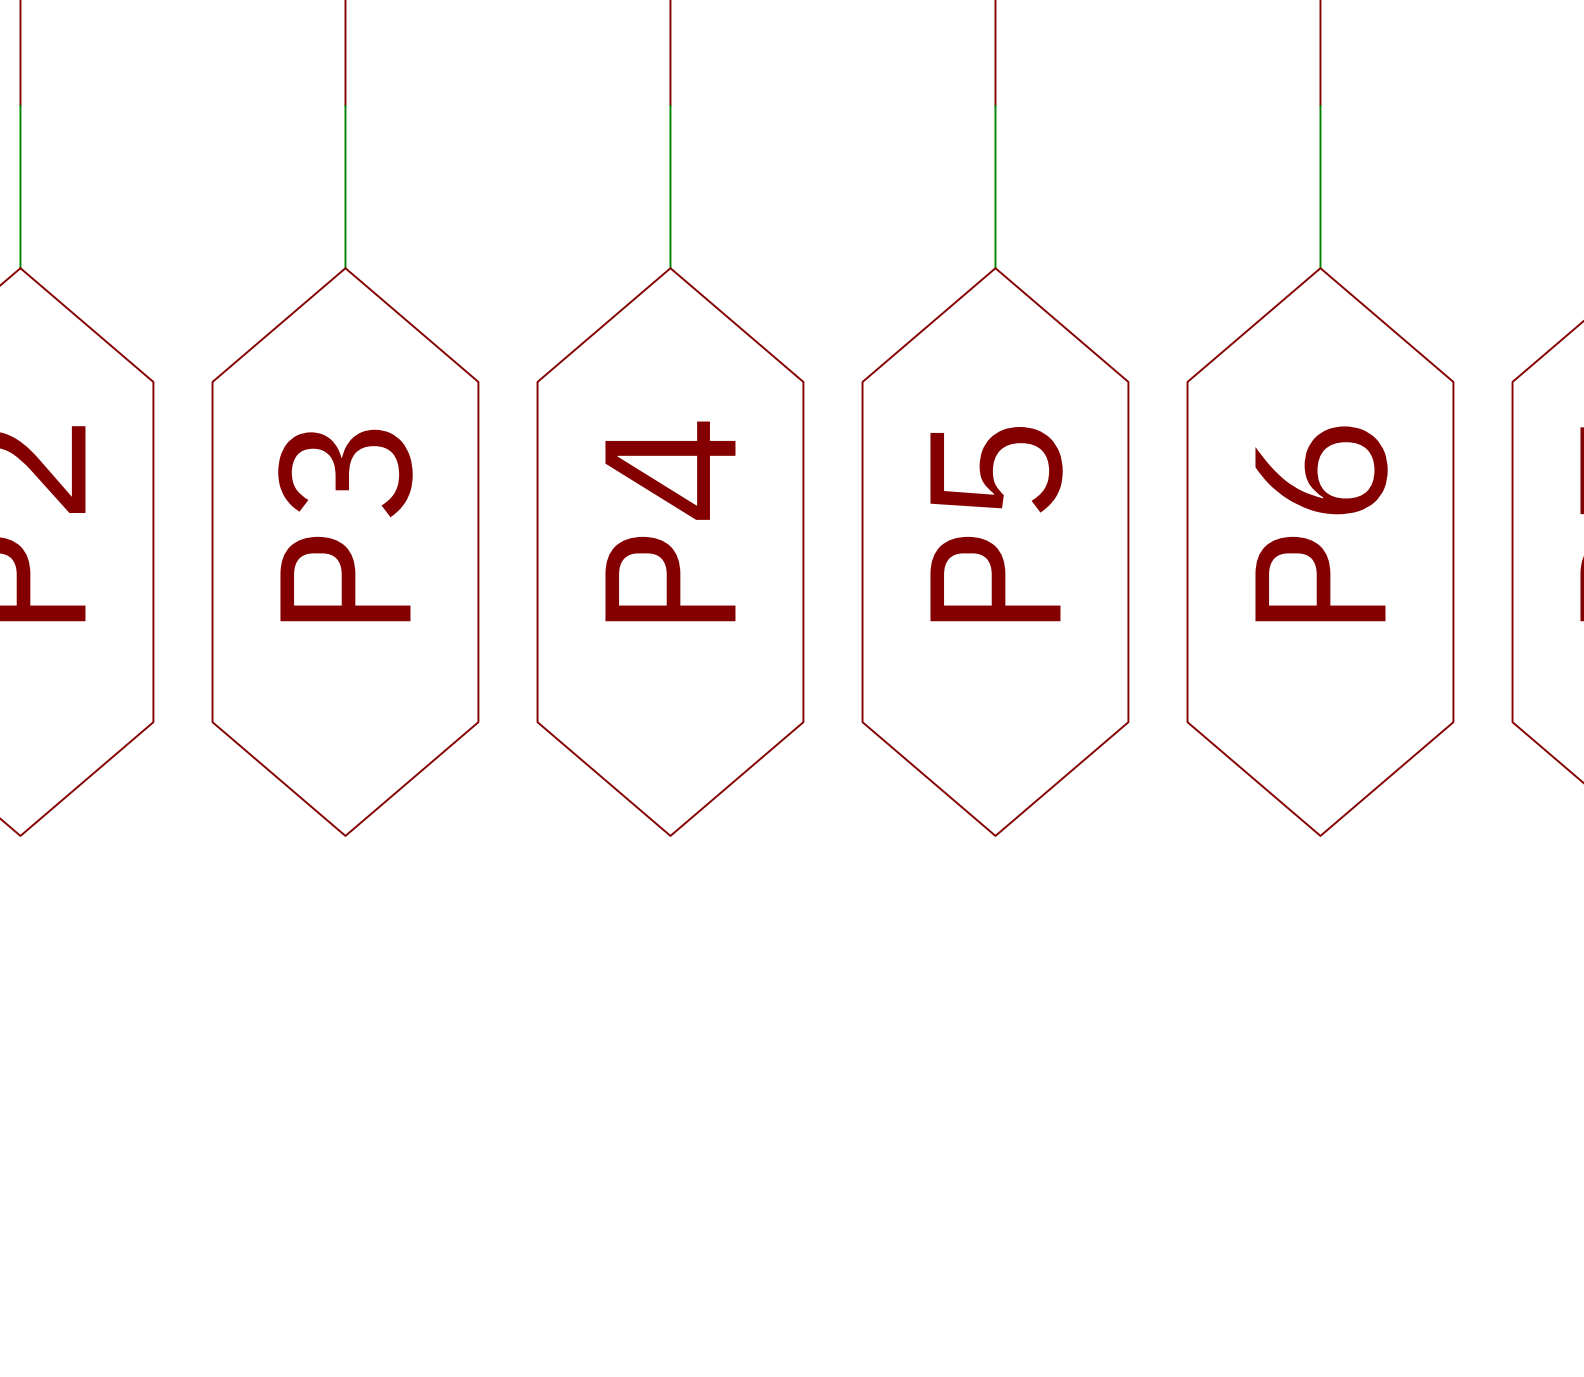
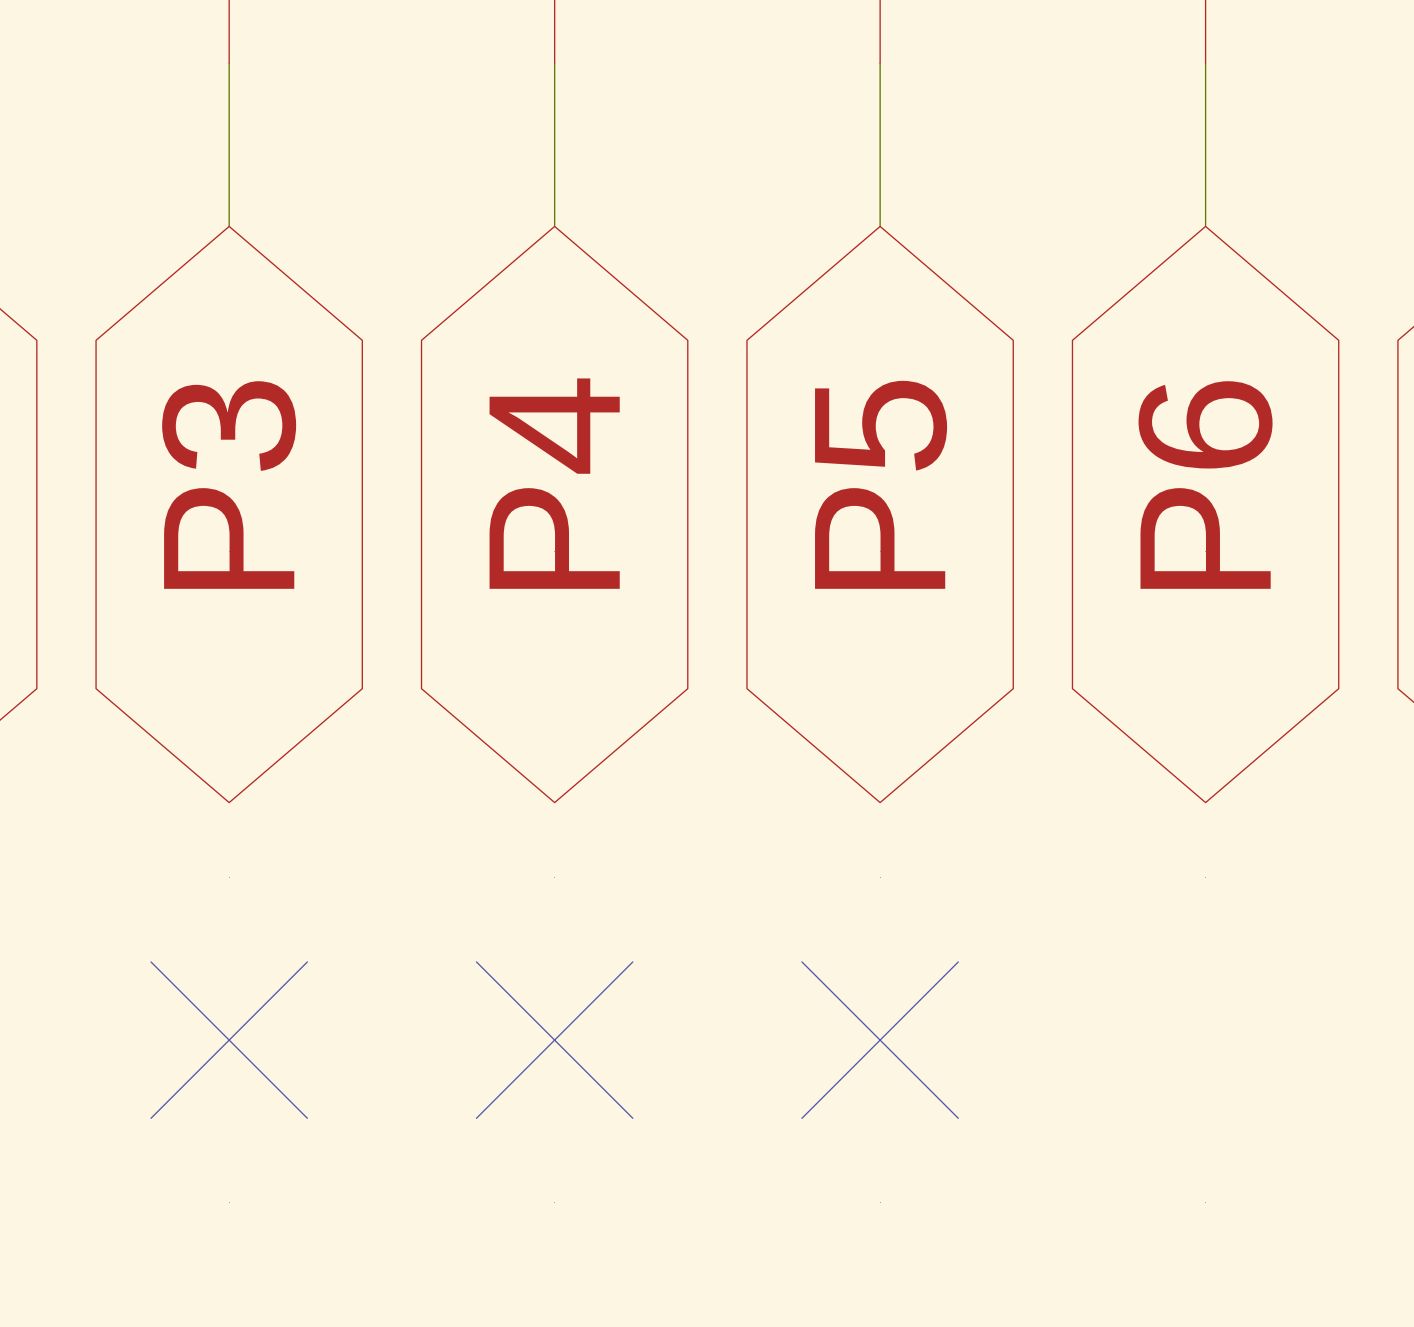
no-connect mark: none -> (229, 1040)
no-connect mark: none -> (554, 1040)
no-connect mark: none -> (880, 1040)

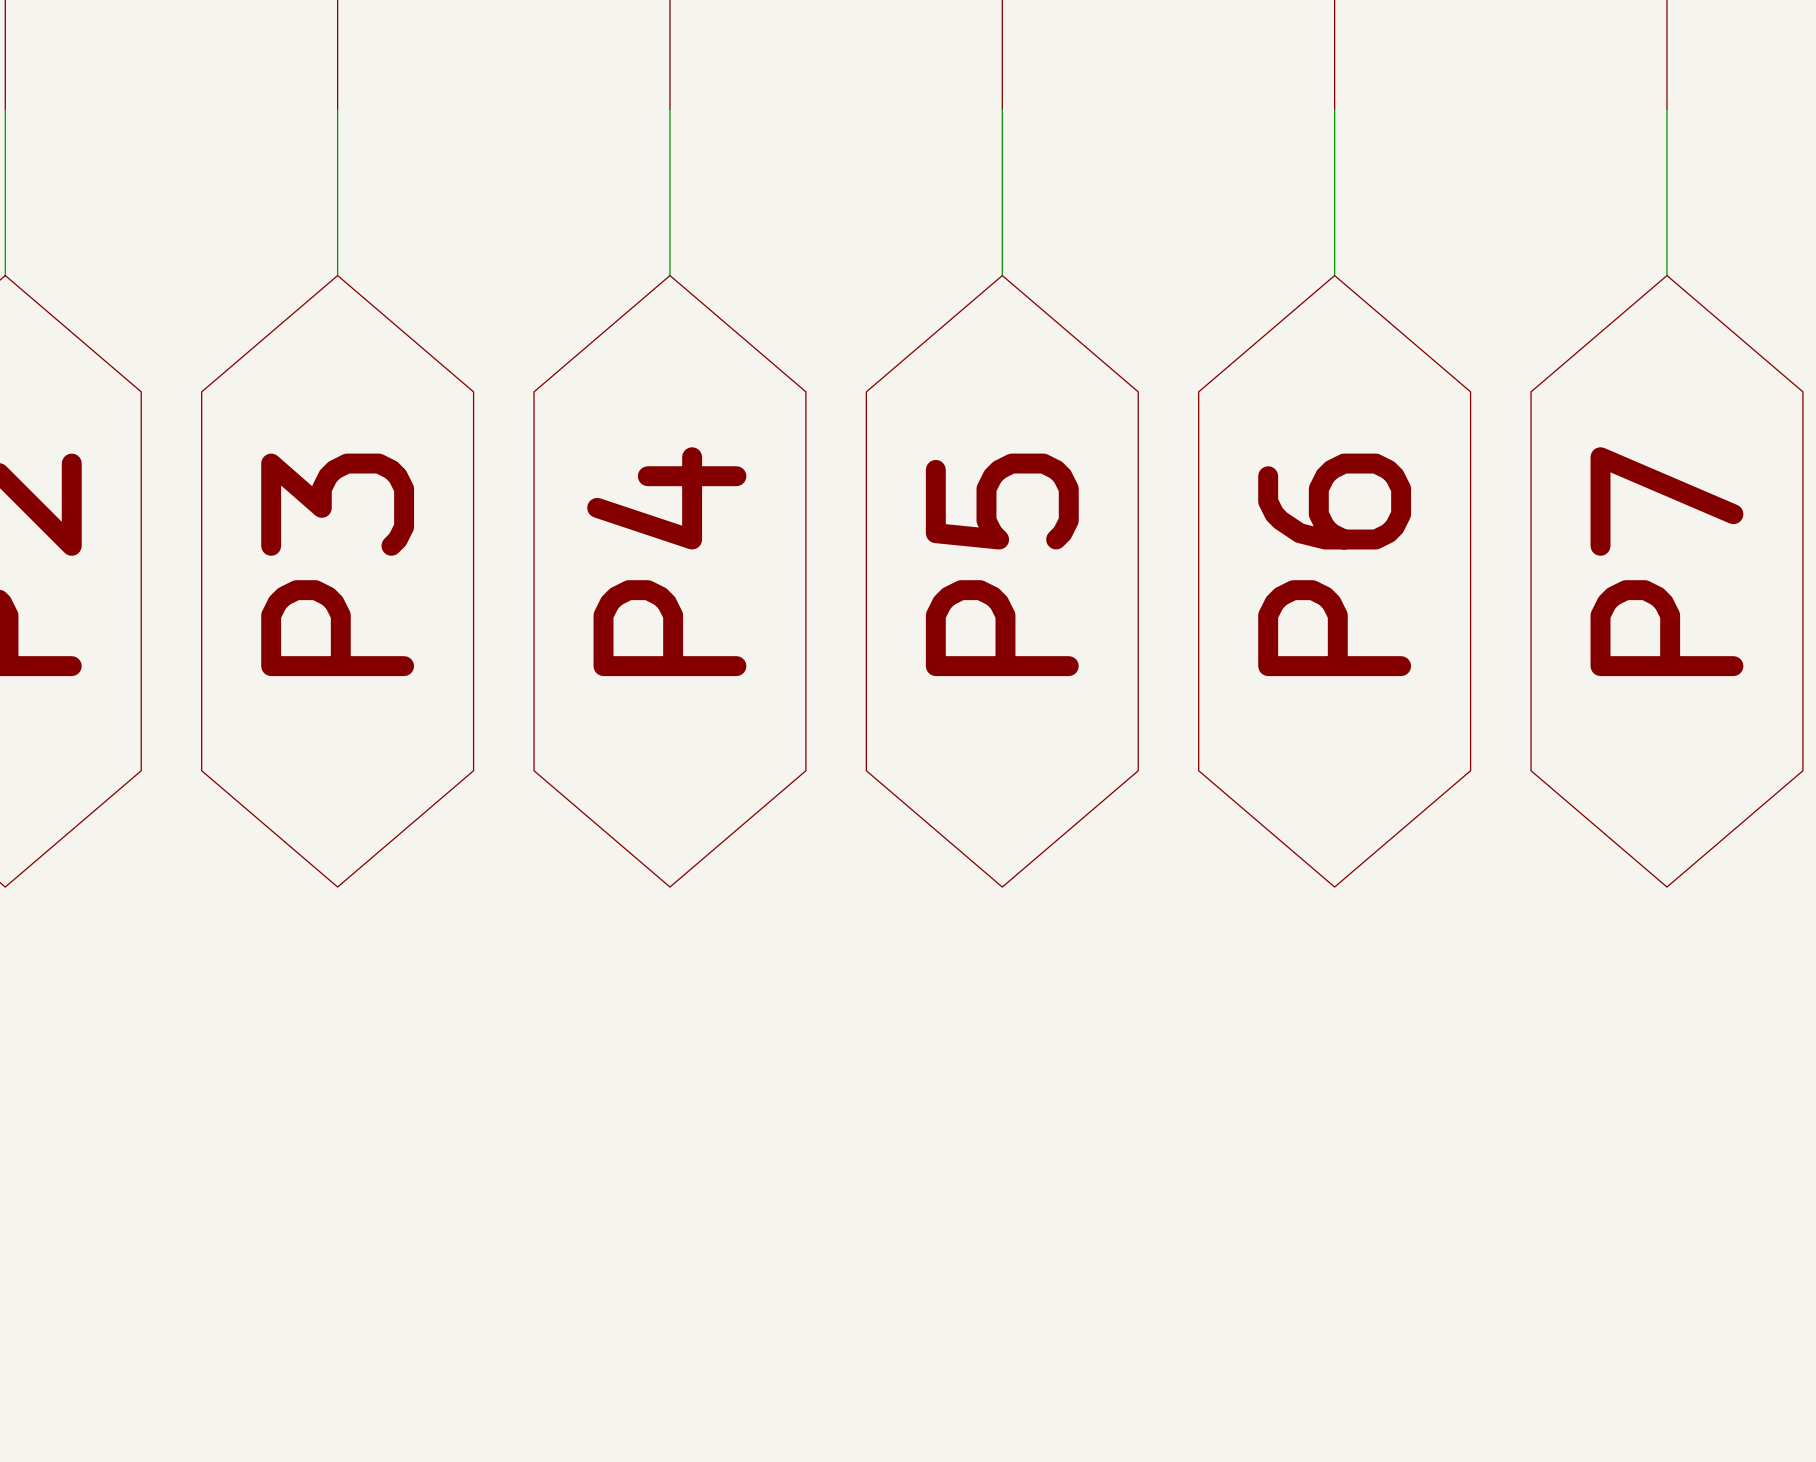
no-connect mark: (229, 1040) -> none
no-connect mark: (554, 1040) -> none
no-connect mark: (880, 1040) -> none

